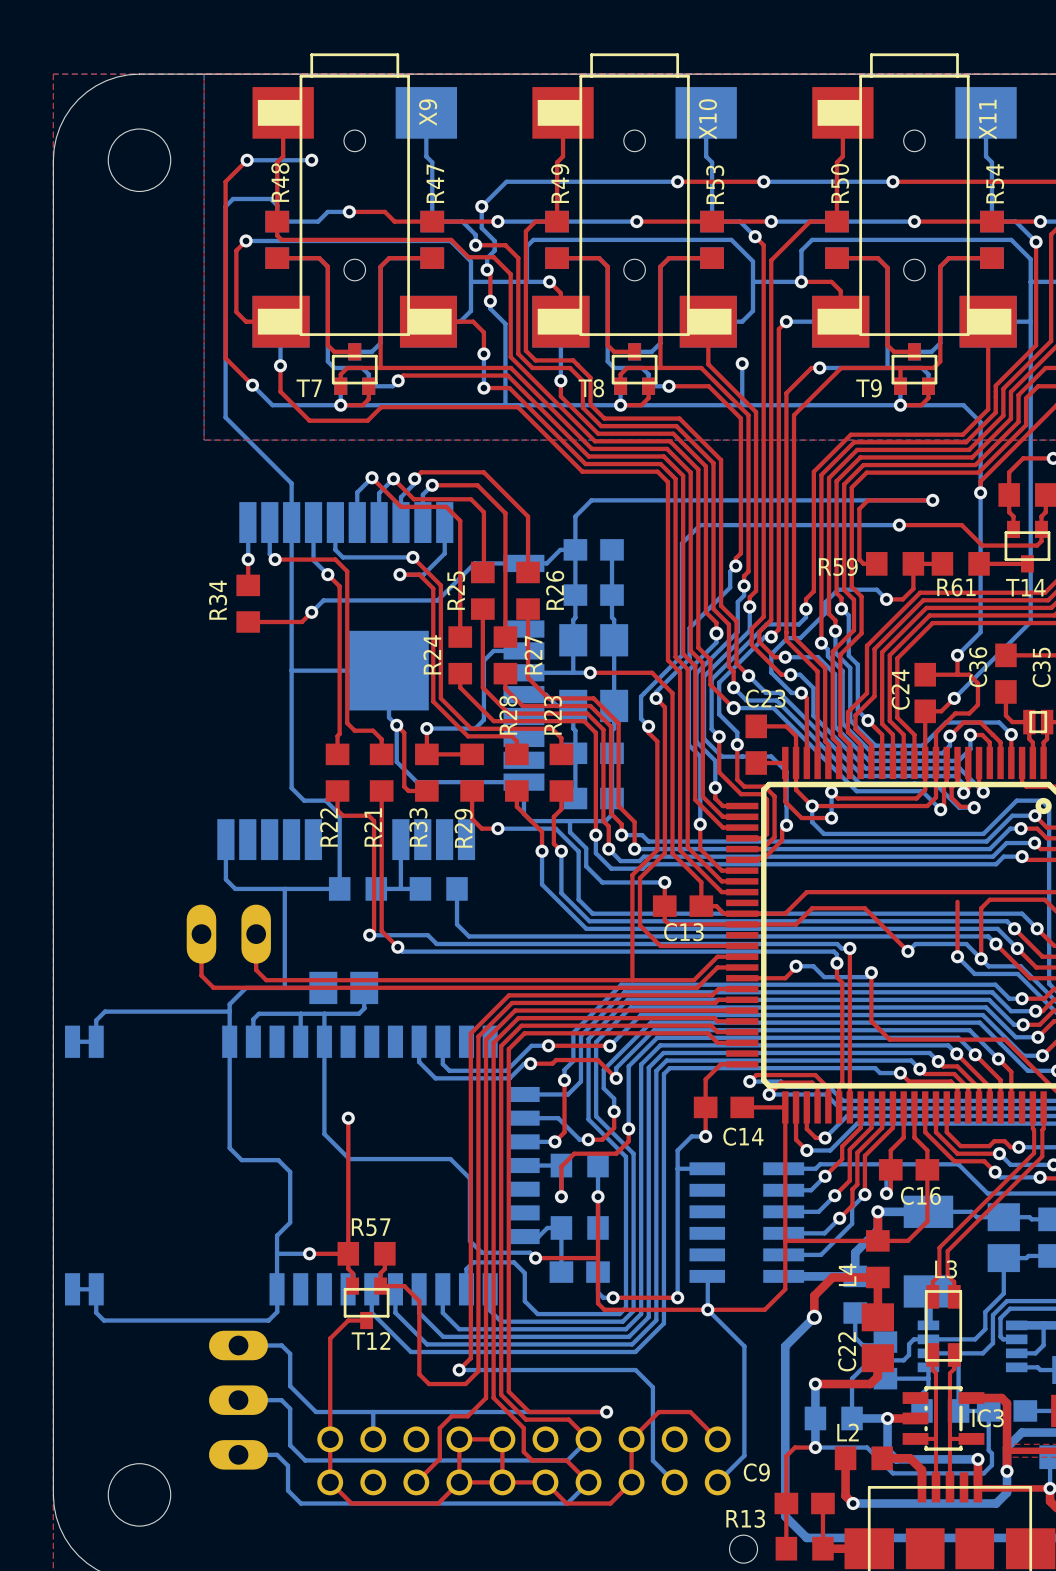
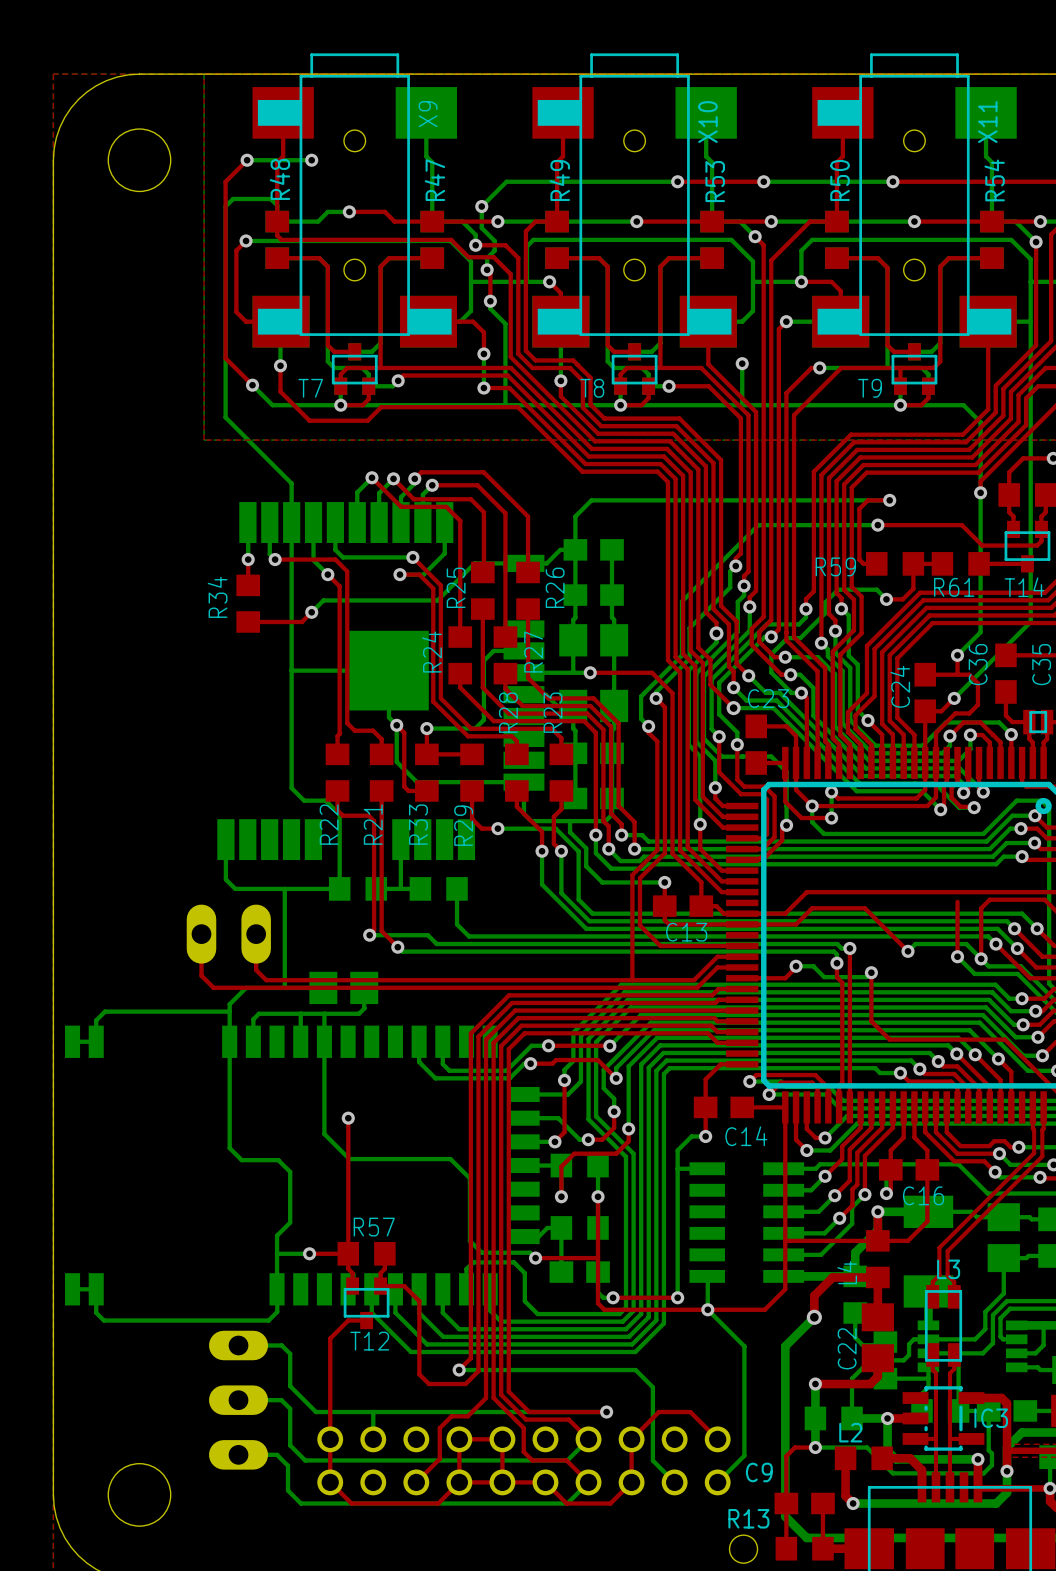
top track: (889, 500) (932, 500) -> none
via: none -> (889, 500)
via: (932, 500) -> none
bottom track: (758, 525) (700, 525) (682, 543) (682, 601) -> (758, 525) (682, 601)
bottom track: (877, 525) (899, 525) -> none
top track: none -> (877, 525) (899, 525)
via: none -> (877, 525)
via: (899, 525) -> none

